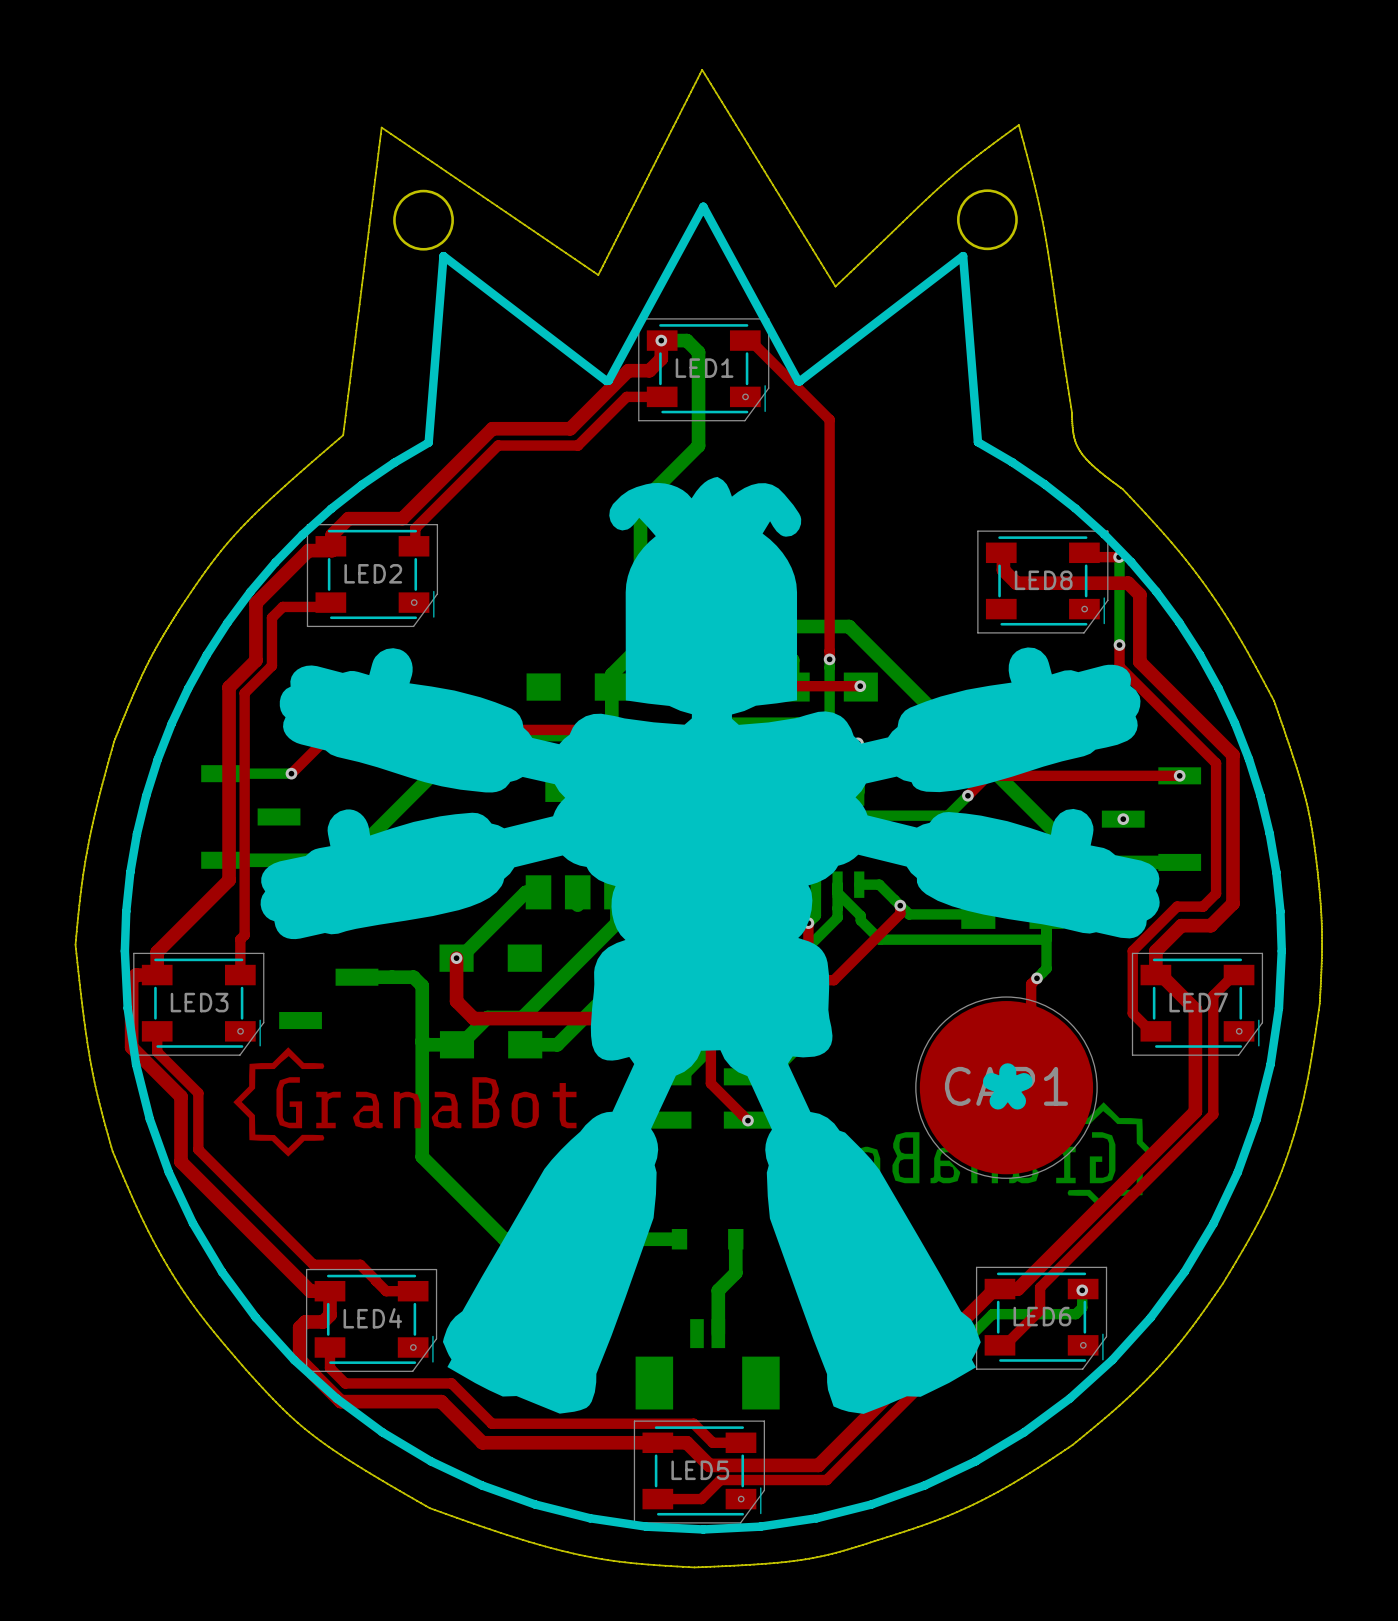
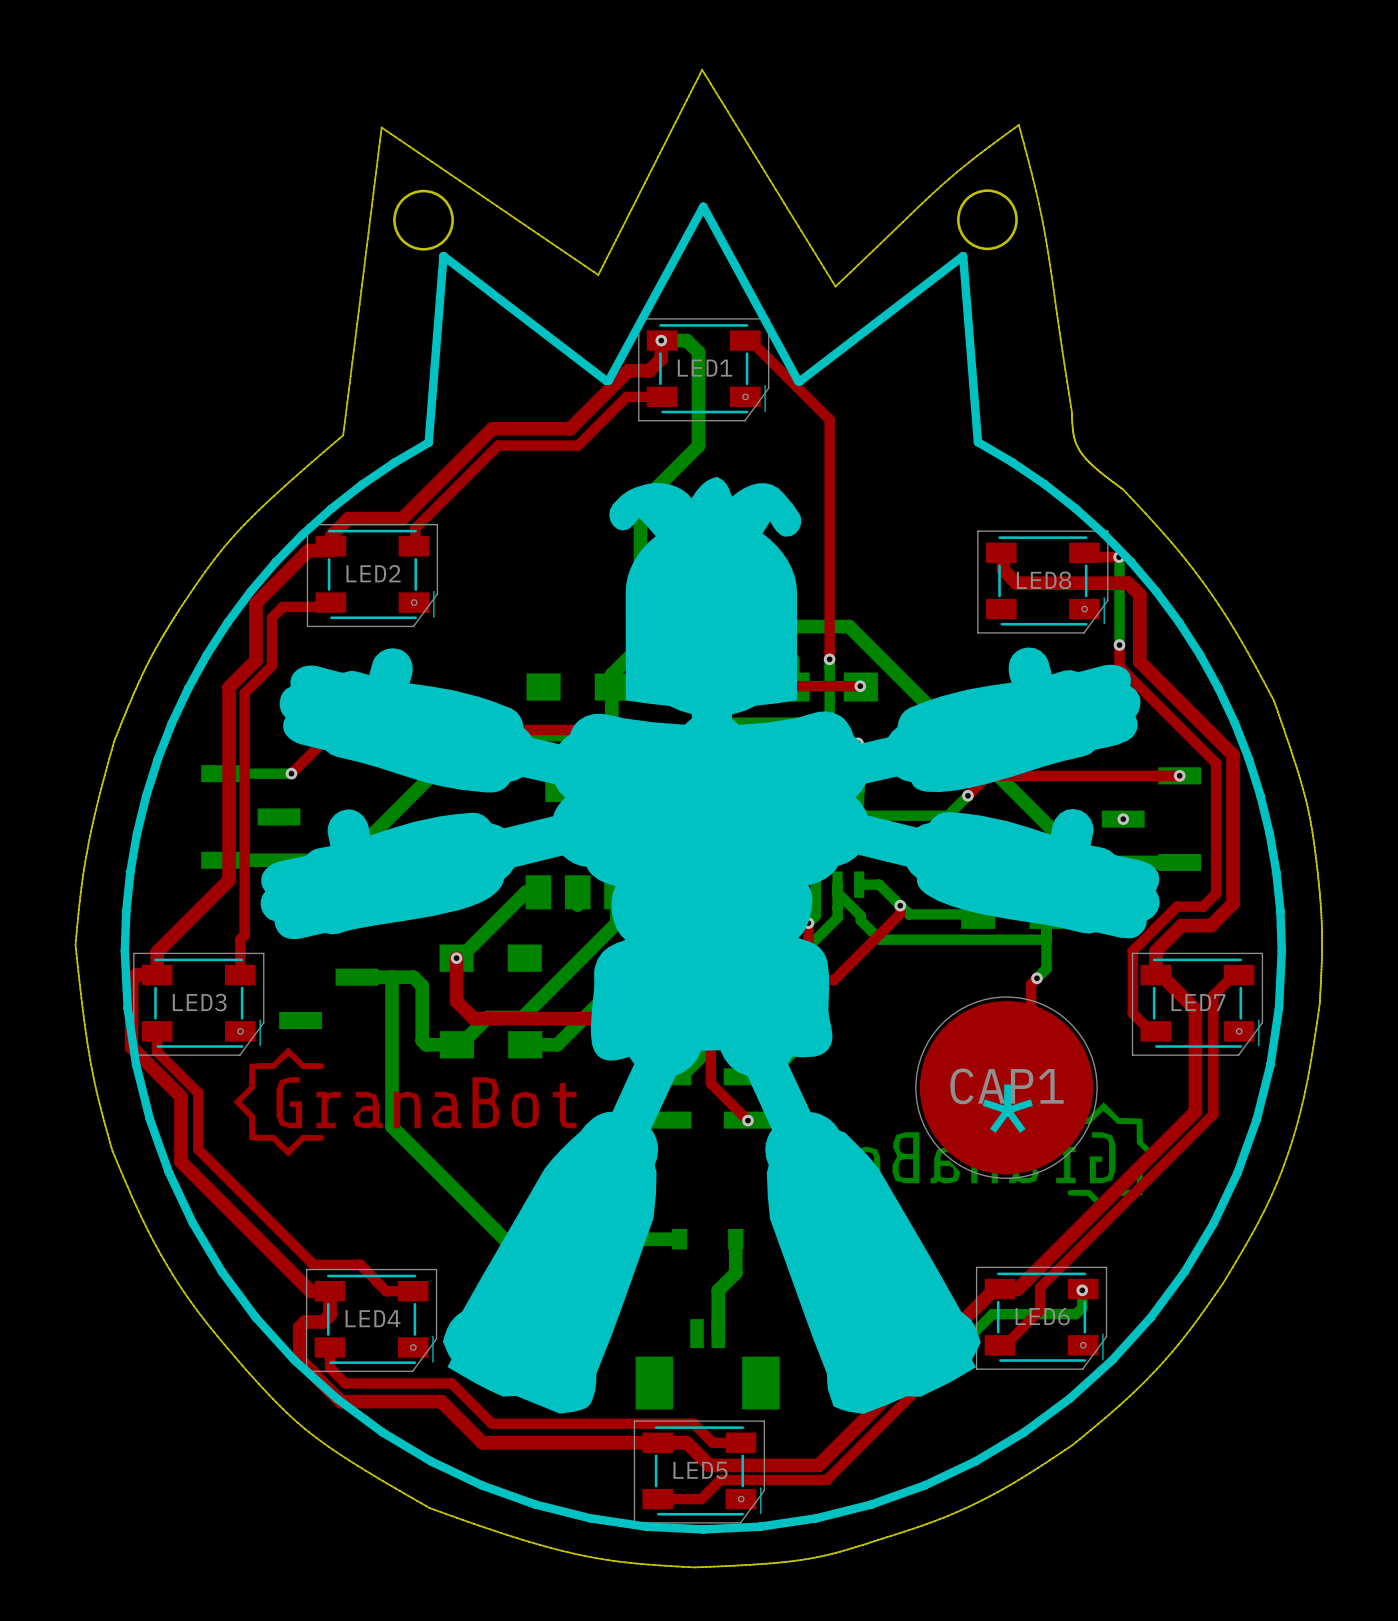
bottom track: (423, 1041) (422, 1156) -> (392, 977) (392, 1126) (422, 1156)

